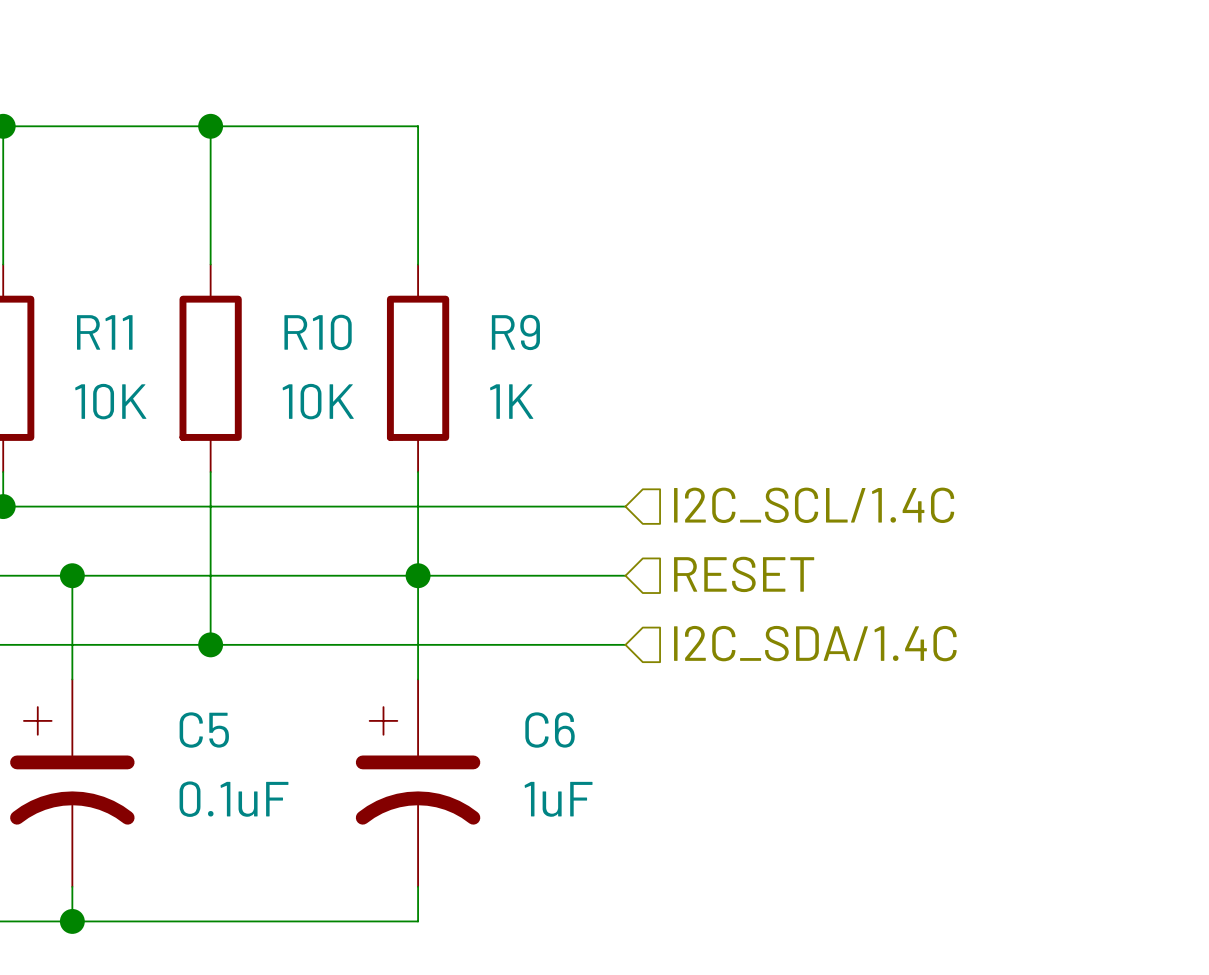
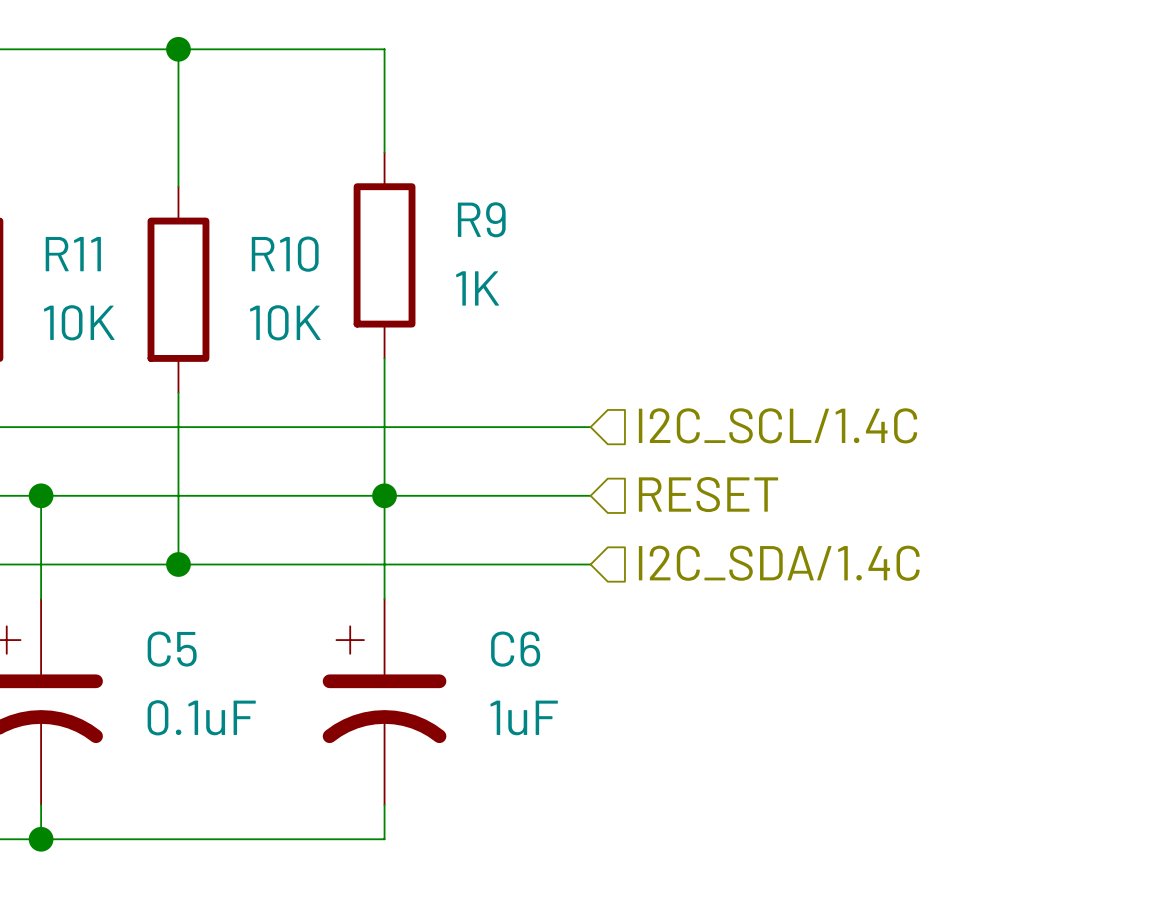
R9 position: (418, 368) -> (384, 255)

